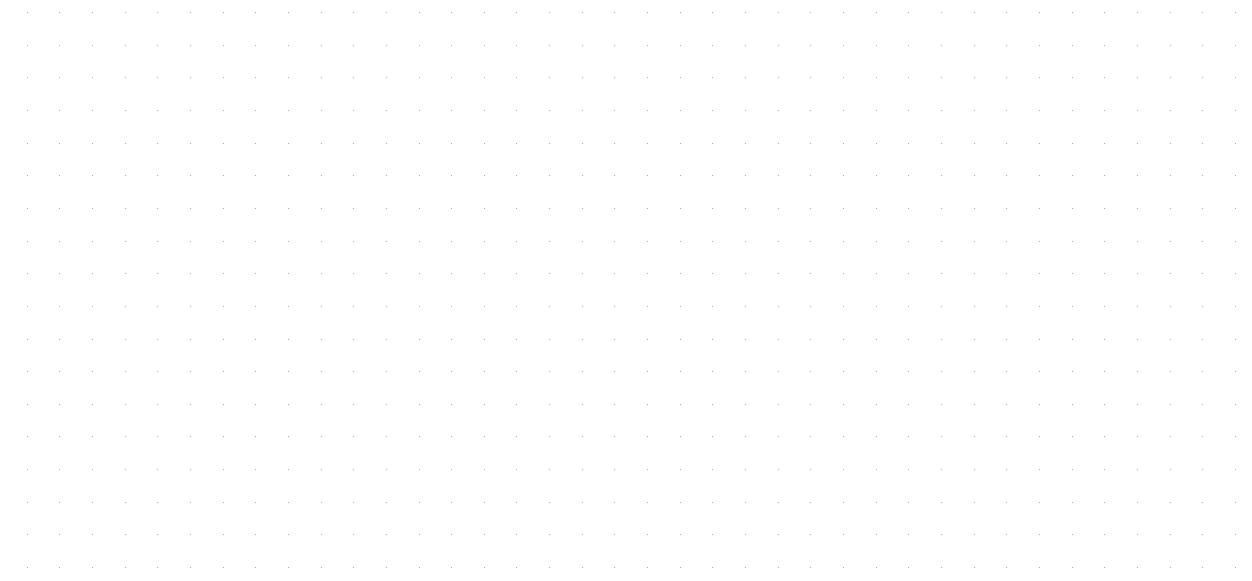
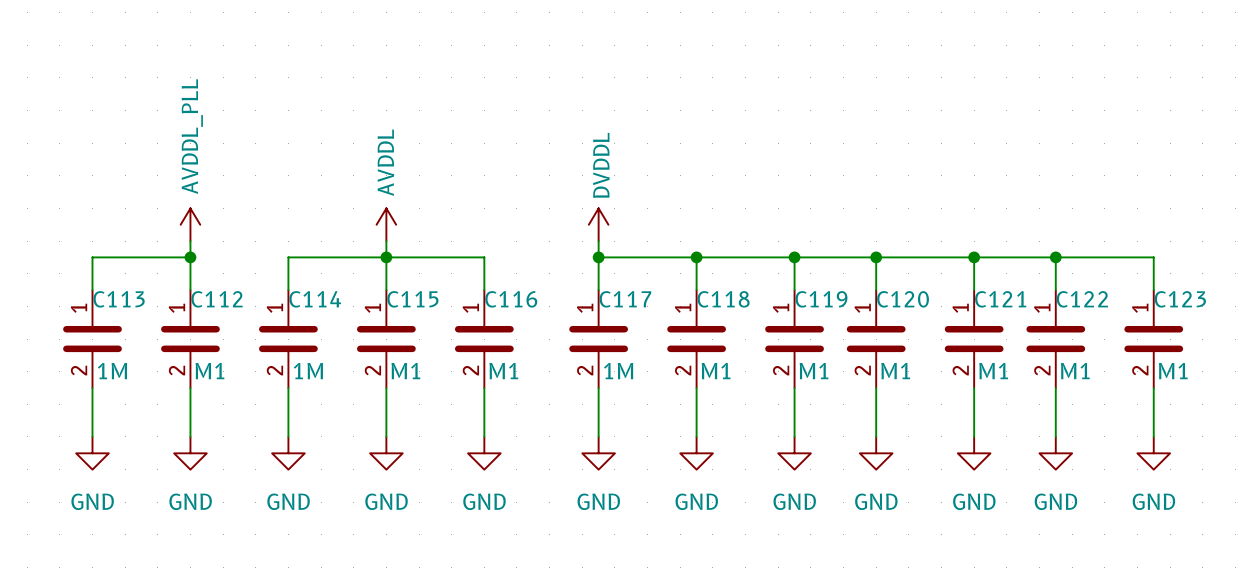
power symbol: none -> AVDDL_PLL (190, 224)
power symbol: none -> AVDDL (386, 224)
power symbol: none -> DVDDL (598, 224)
wire: none -> (190, 241) (190, 290)
wire: none -> (386, 241) (386, 290)
wire: none -> (598, 241) (598, 290)
wire: none -> (190, 257) (92, 257) (92, 290)
junction: none -> (190, 257)
junction: none -> (386, 257)
wire: none -> (598, 257) (1153, 257) (1153, 290)
junction: none -> (598, 257)
wire: none -> (696, 257) (696, 290)
junction: none -> (696, 257)
wire: none -> (794, 257) (794, 290)
junction: none -> (794, 257)
wire: none -> (876, 257) (876, 290)
junction: none -> (876, 257)
wire: none -> (974, 257) (974, 290)
junction: none -> (974, 257)
wire: none -> (1055, 257) (1055, 290)
junction: none -> (1055, 257)
wire: none -> (288, 290) (288, 257) (484, 257) (484, 290)
C113: none -> 1M (92, 339)
C112: none -> M1 (190, 339)
C114: none -> 1M (288, 339)
C115: none -> M1 (386, 339)
C116: none -> M1 (484, 339)
C117: none -> 1M (598, 339)
C118: none -> M1 (696, 339)
C119: none -> M1 (794, 339)
C120: none -> M1 (876, 339)
C121: none -> M1 (974, 339)
C122: none -> M1 (1055, 339)
C123: none -> M1 (1153, 339)
wire: none -> (92, 388) (92, 436)
wire: none -> (190, 388) (190, 436)
wire: none -> (288, 388) (288, 436)
wire: none -> (386, 388) (386, 436)
wire: none -> (484, 388) (484, 436)
wire: none -> (598, 388) (598, 436)
wire: none -> (696, 388) (696, 436)
wire: none -> (794, 388) (794, 436)
wire: none -> (876, 388) (876, 436)
wire: none -> (974, 388) (974, 436)
wire: none -> (1055, 388) (1055, 436)
wire: none -> (1153, 388) (1153, 436)
power symbol: none -> GND (92, 453)
power symbol: none -> GND (190, 453)
power symbol: none -> GND (288, 453)
power symbol: none -> GND (386, 453)
power symbol: none -> GND (484, 453)
power symbol: none -> GND (598, 453)
power symbol: none -> GND (696, 453)
power symbol: none -> GND (794, 453)
power symbol: none -> GND (876, 453)
power symbol: none -> GND (974, 453)
power symbol: none -> GND (1055, 453)
power symbol: none -> GND (1153, 453)

